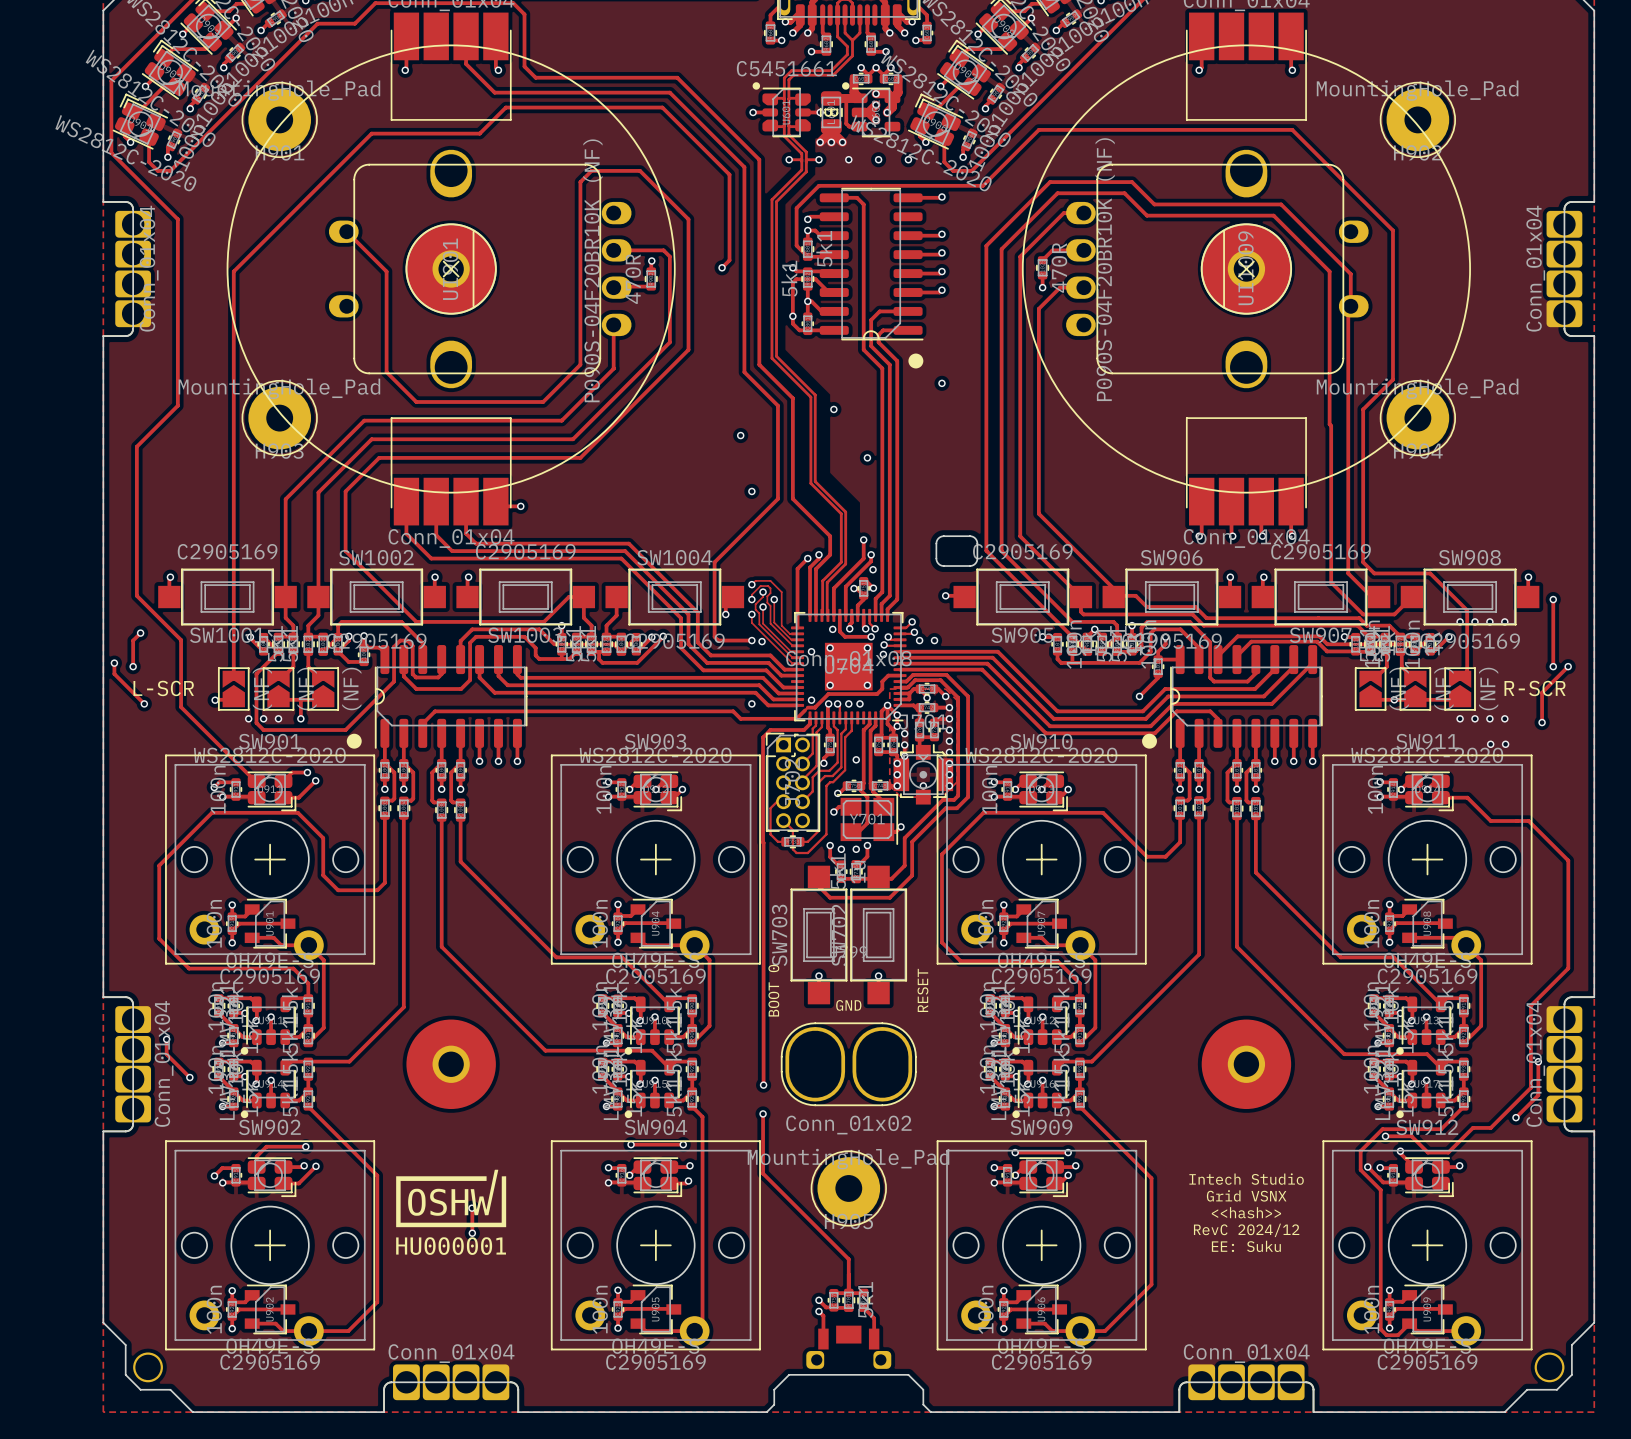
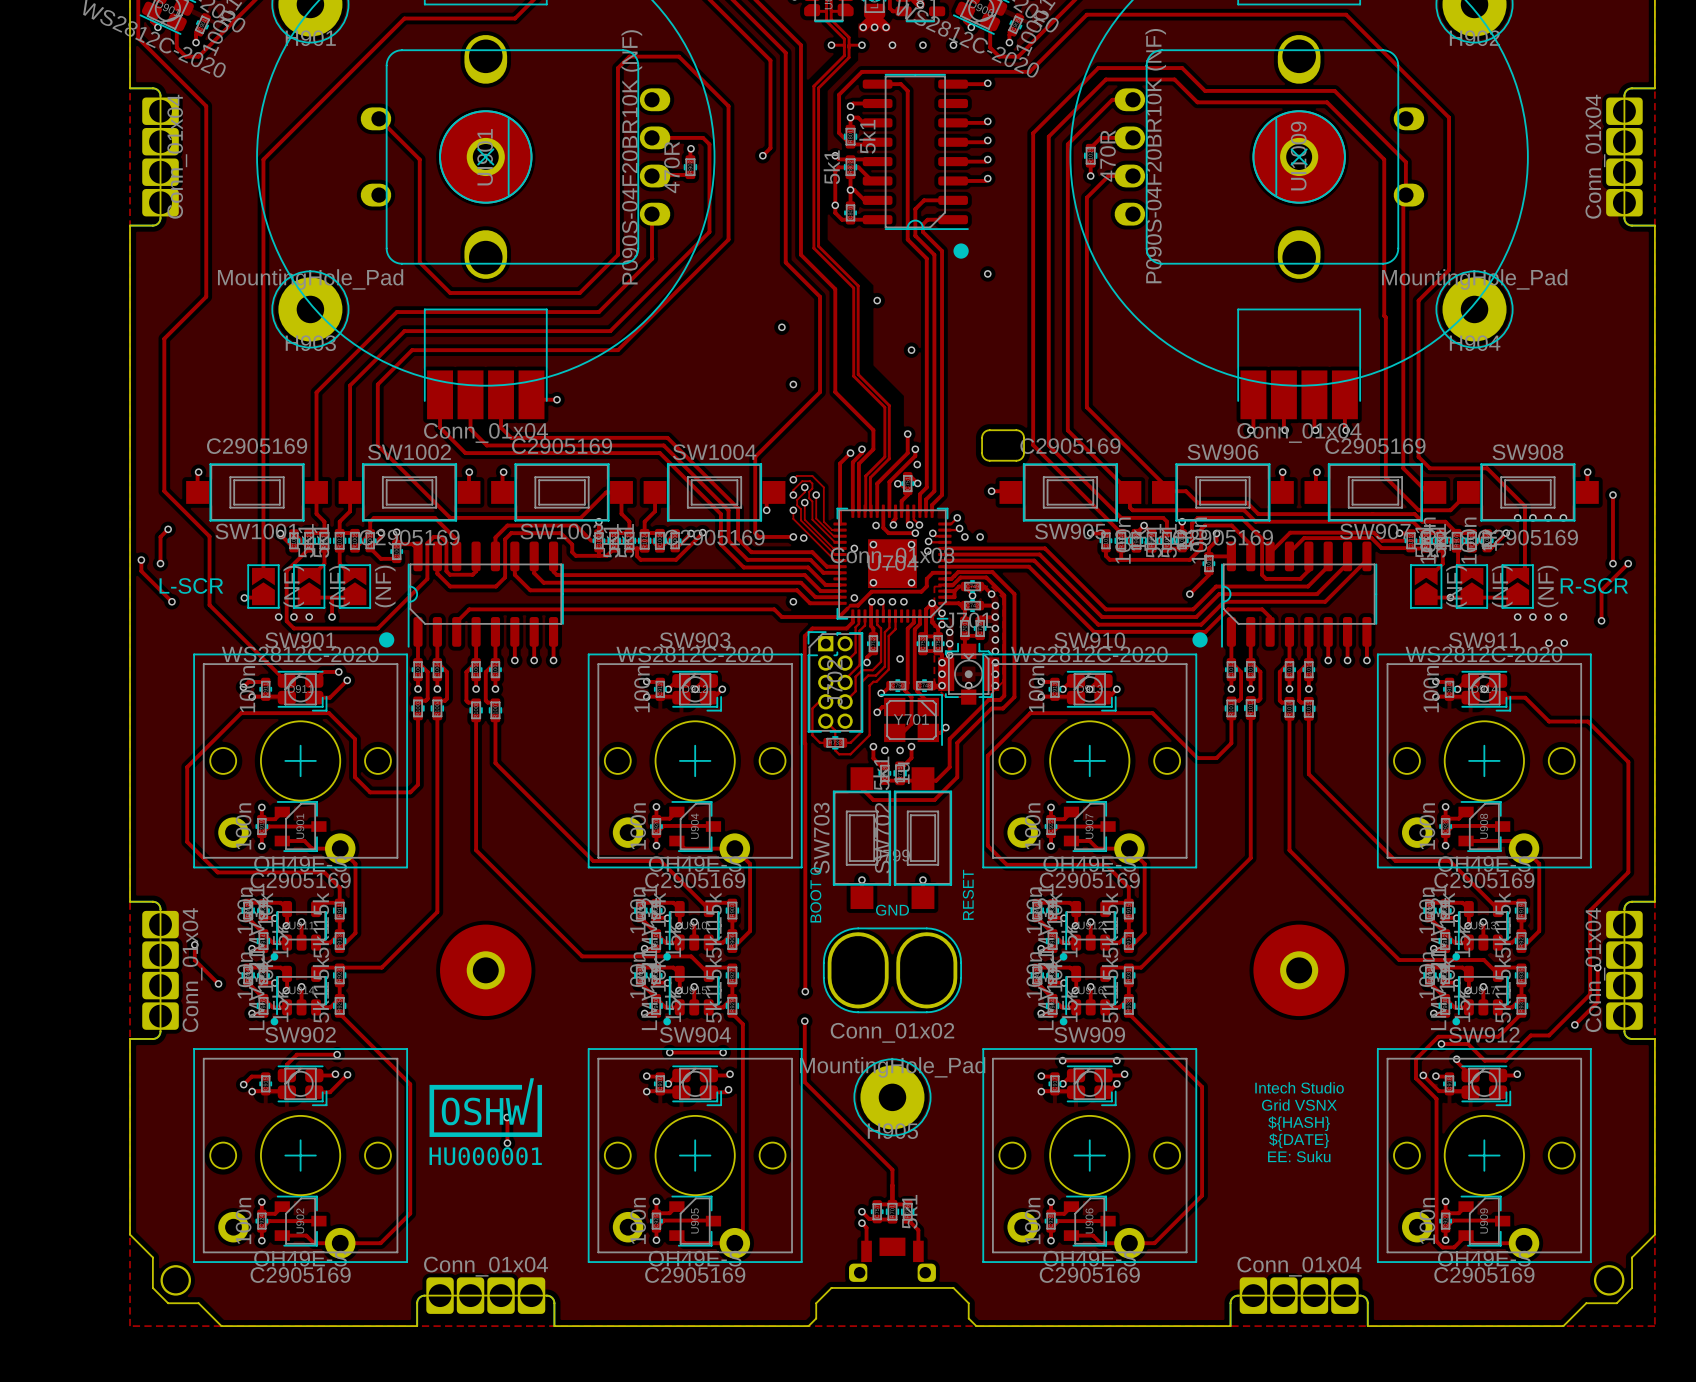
text: <<hash>> (1246, 1212) -> ${HASH} (1299, 1123)
text: RevC 2024/12 (1246, 1230) -> ${DATE} (1299, 1140)

